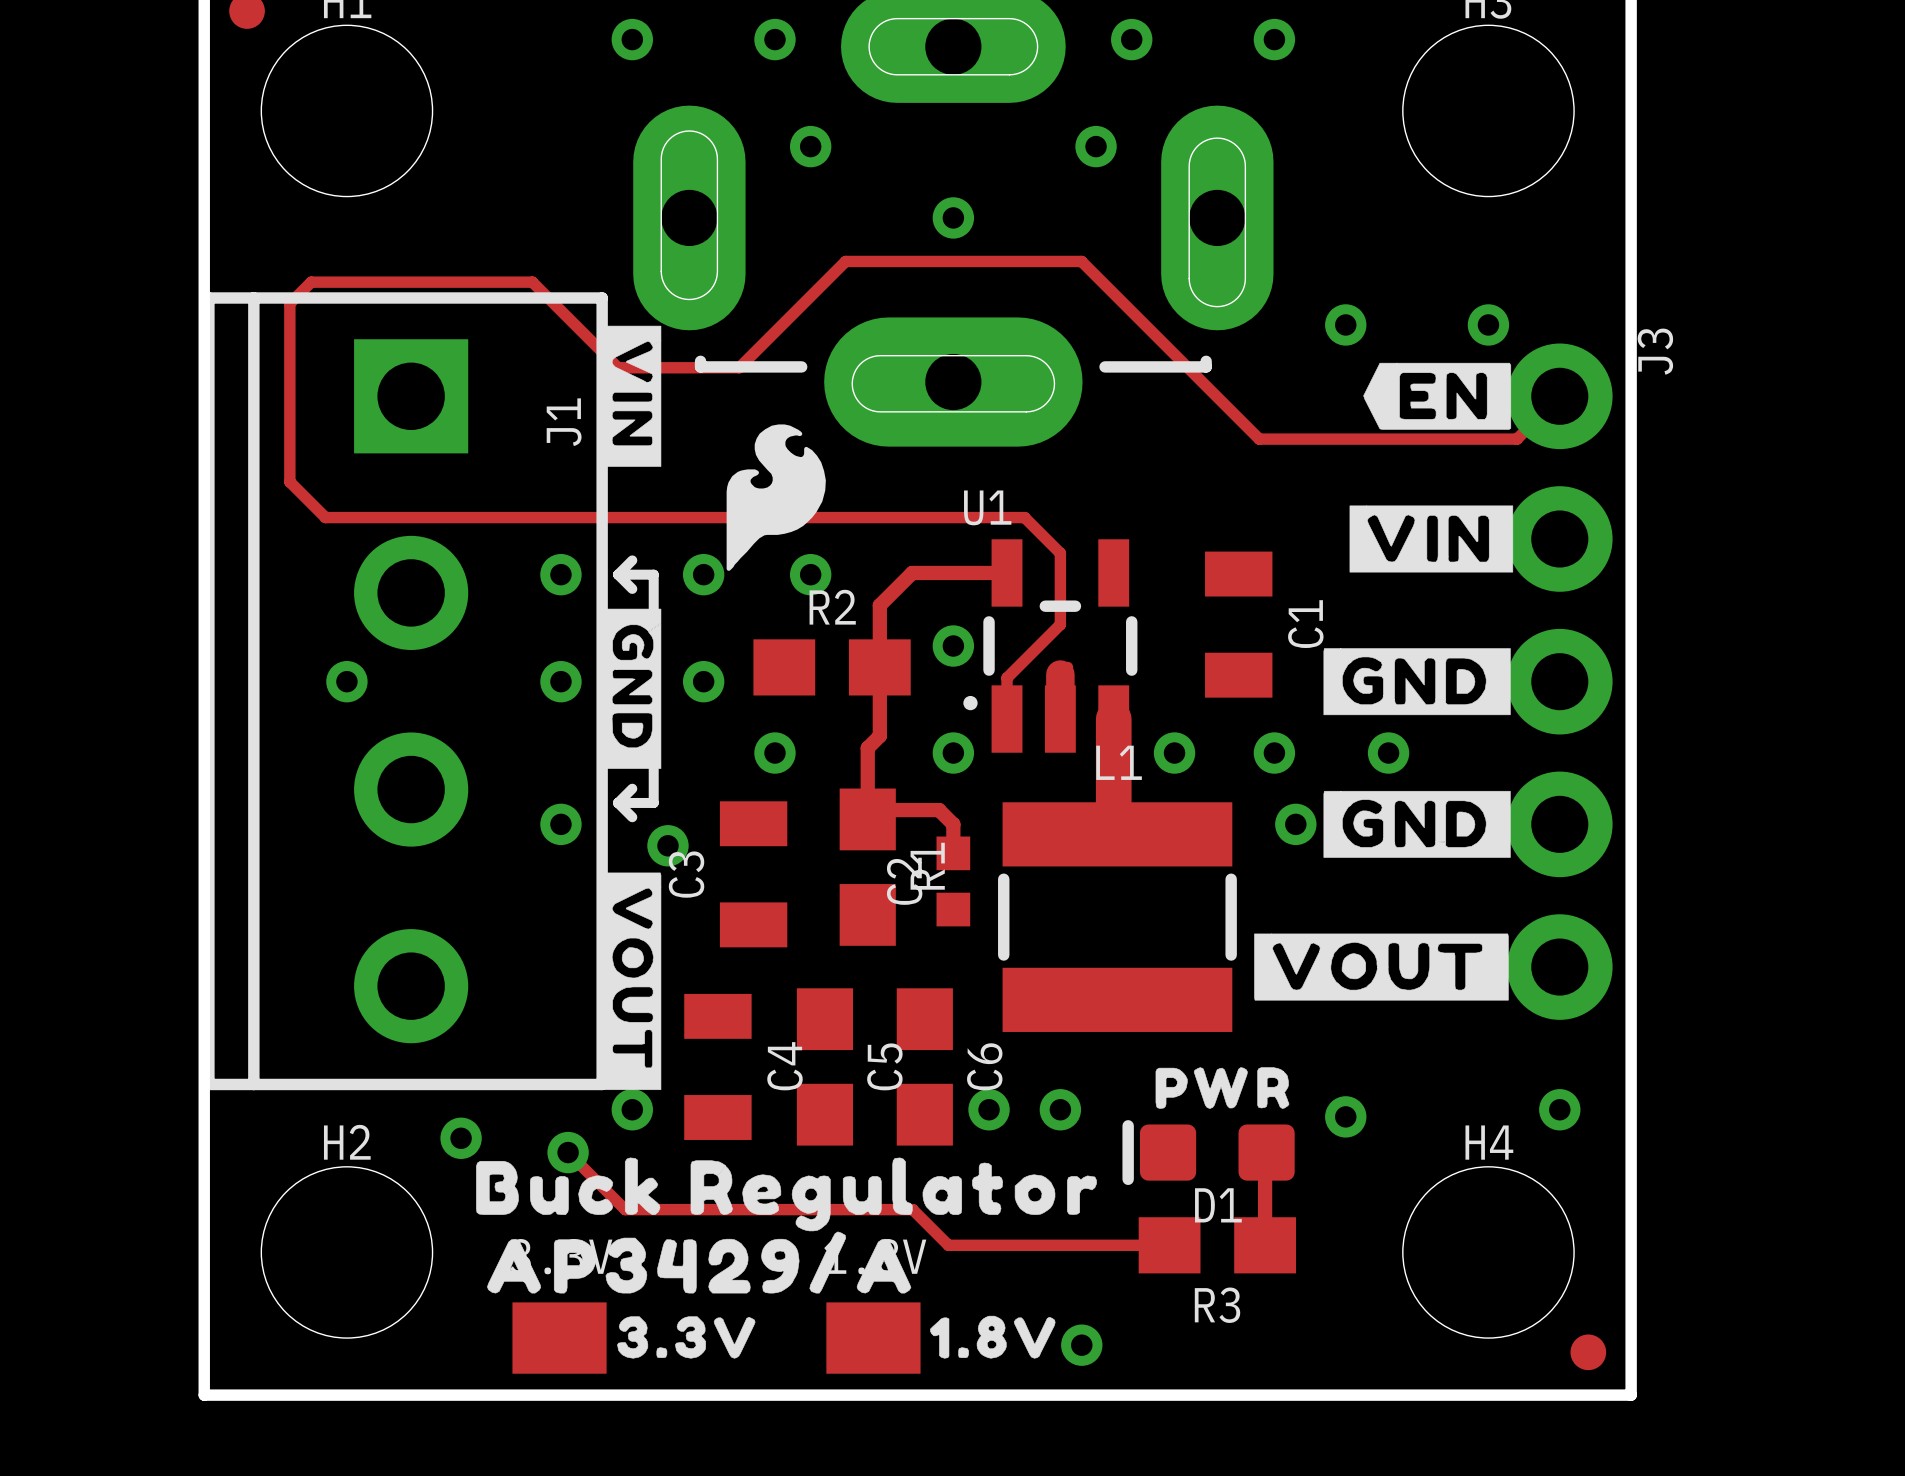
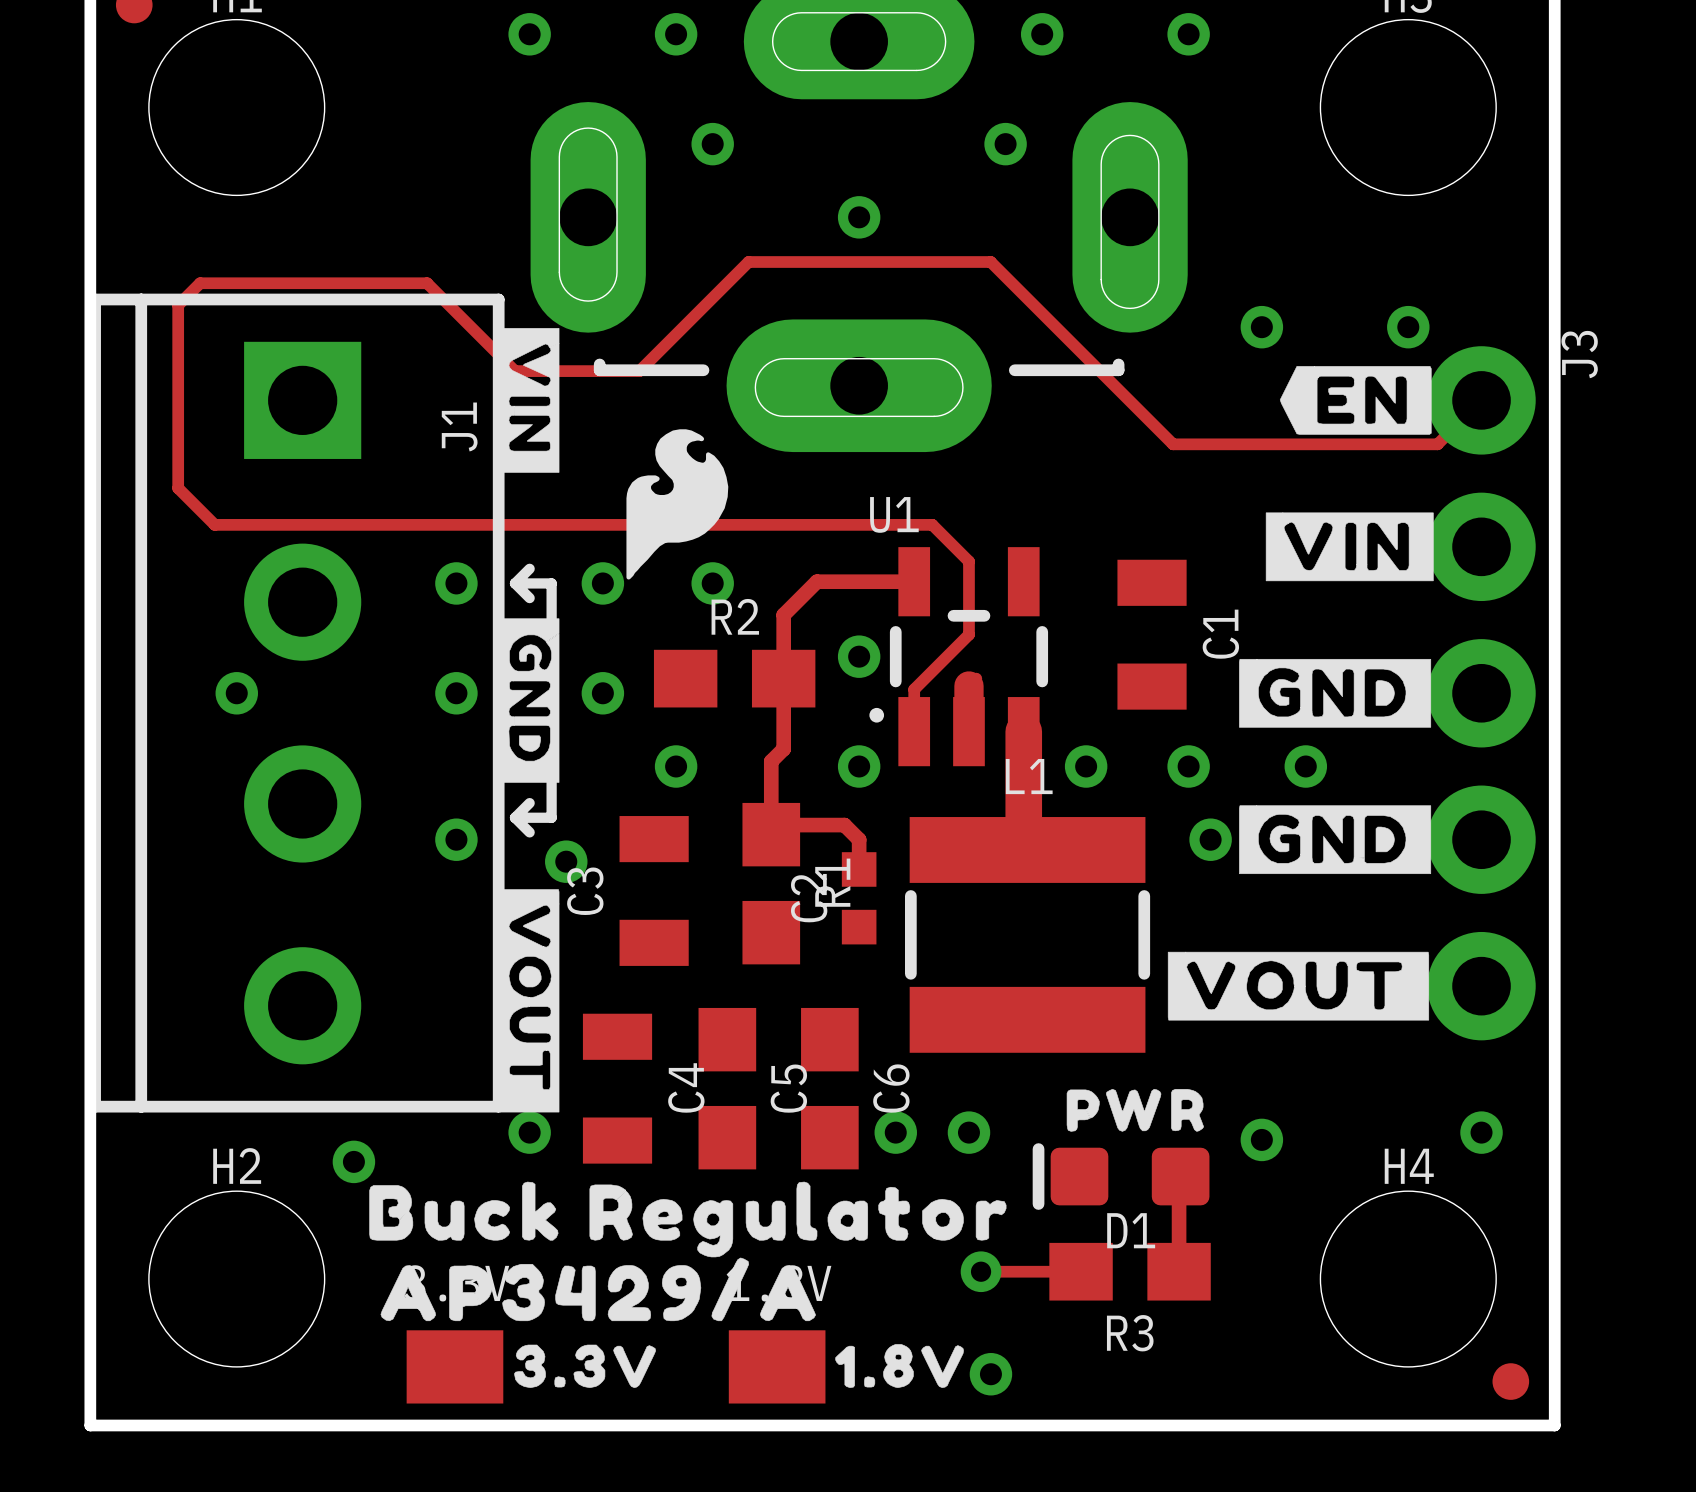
track: (568, 1152) (625, 1209) (912, 1209) (948, 1245) (1072, 1245) -> none
via: (568, 1152) -> none
via: none -> (981, 1271)

